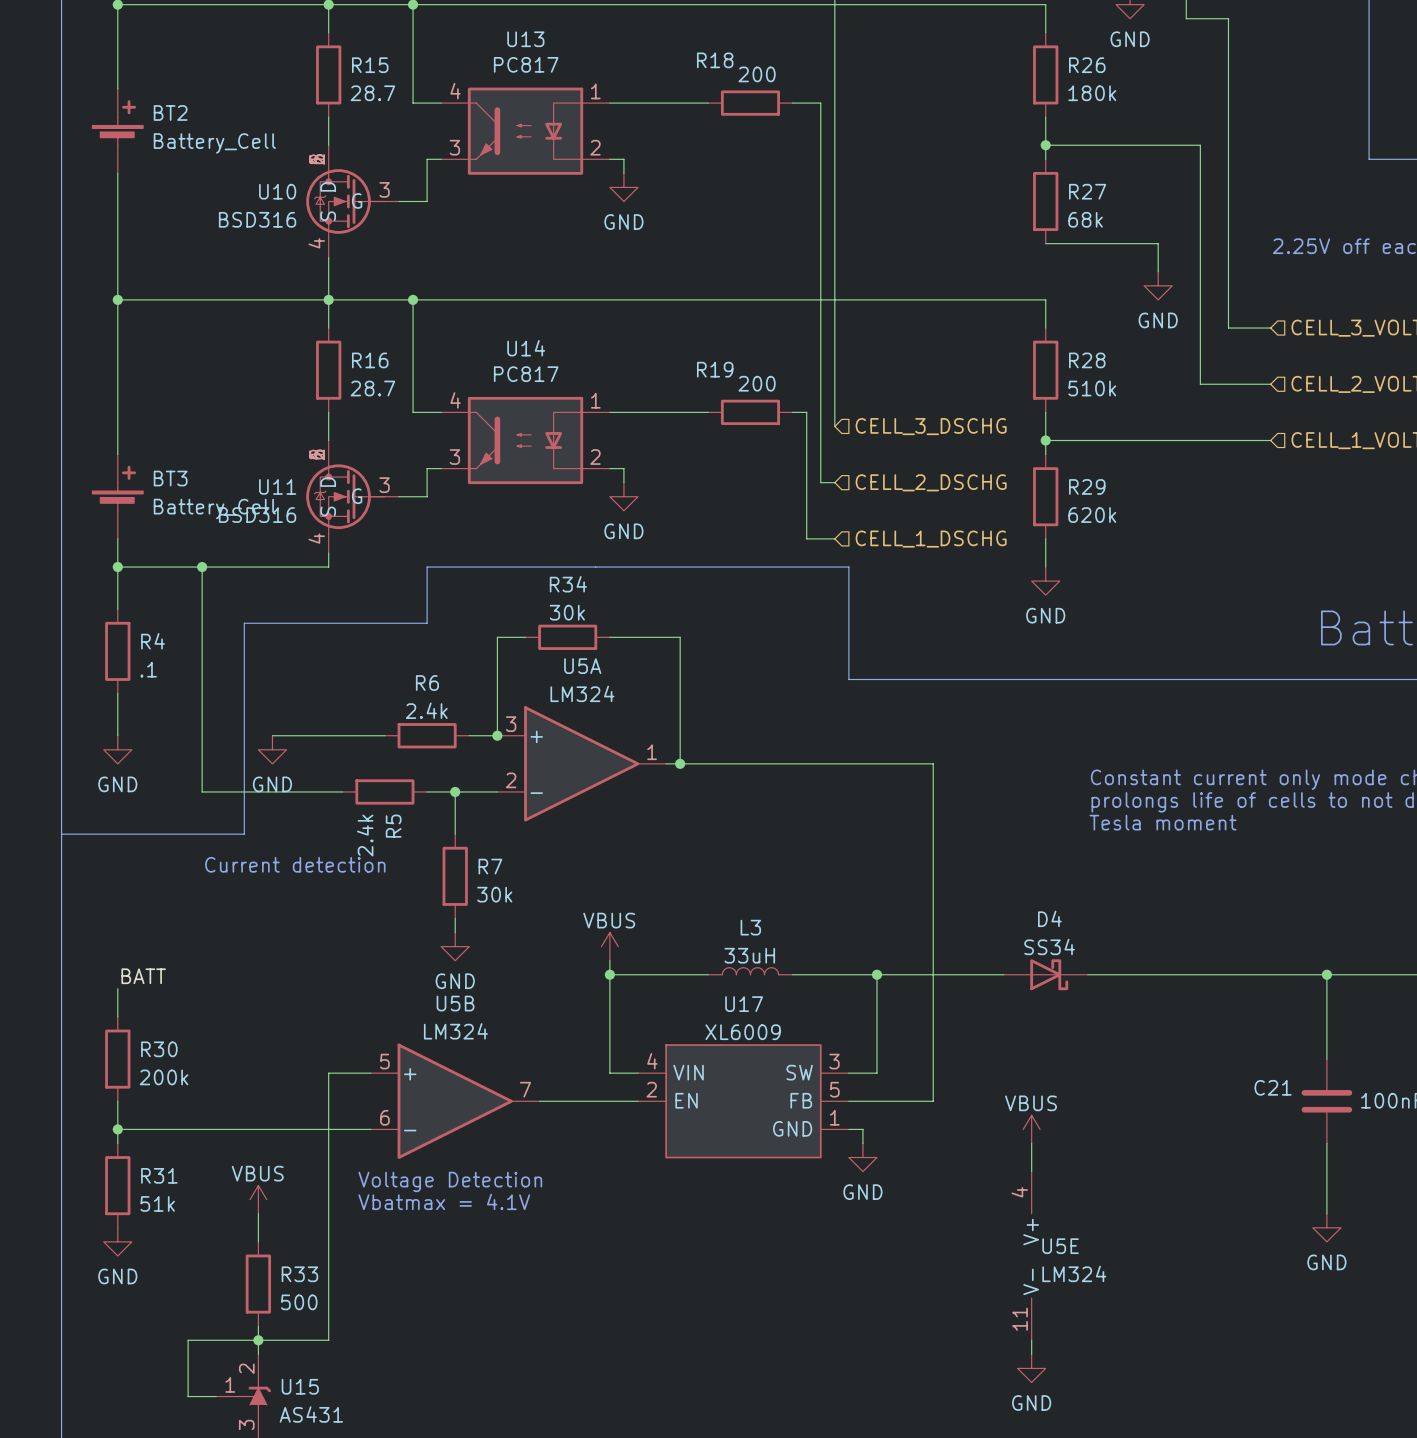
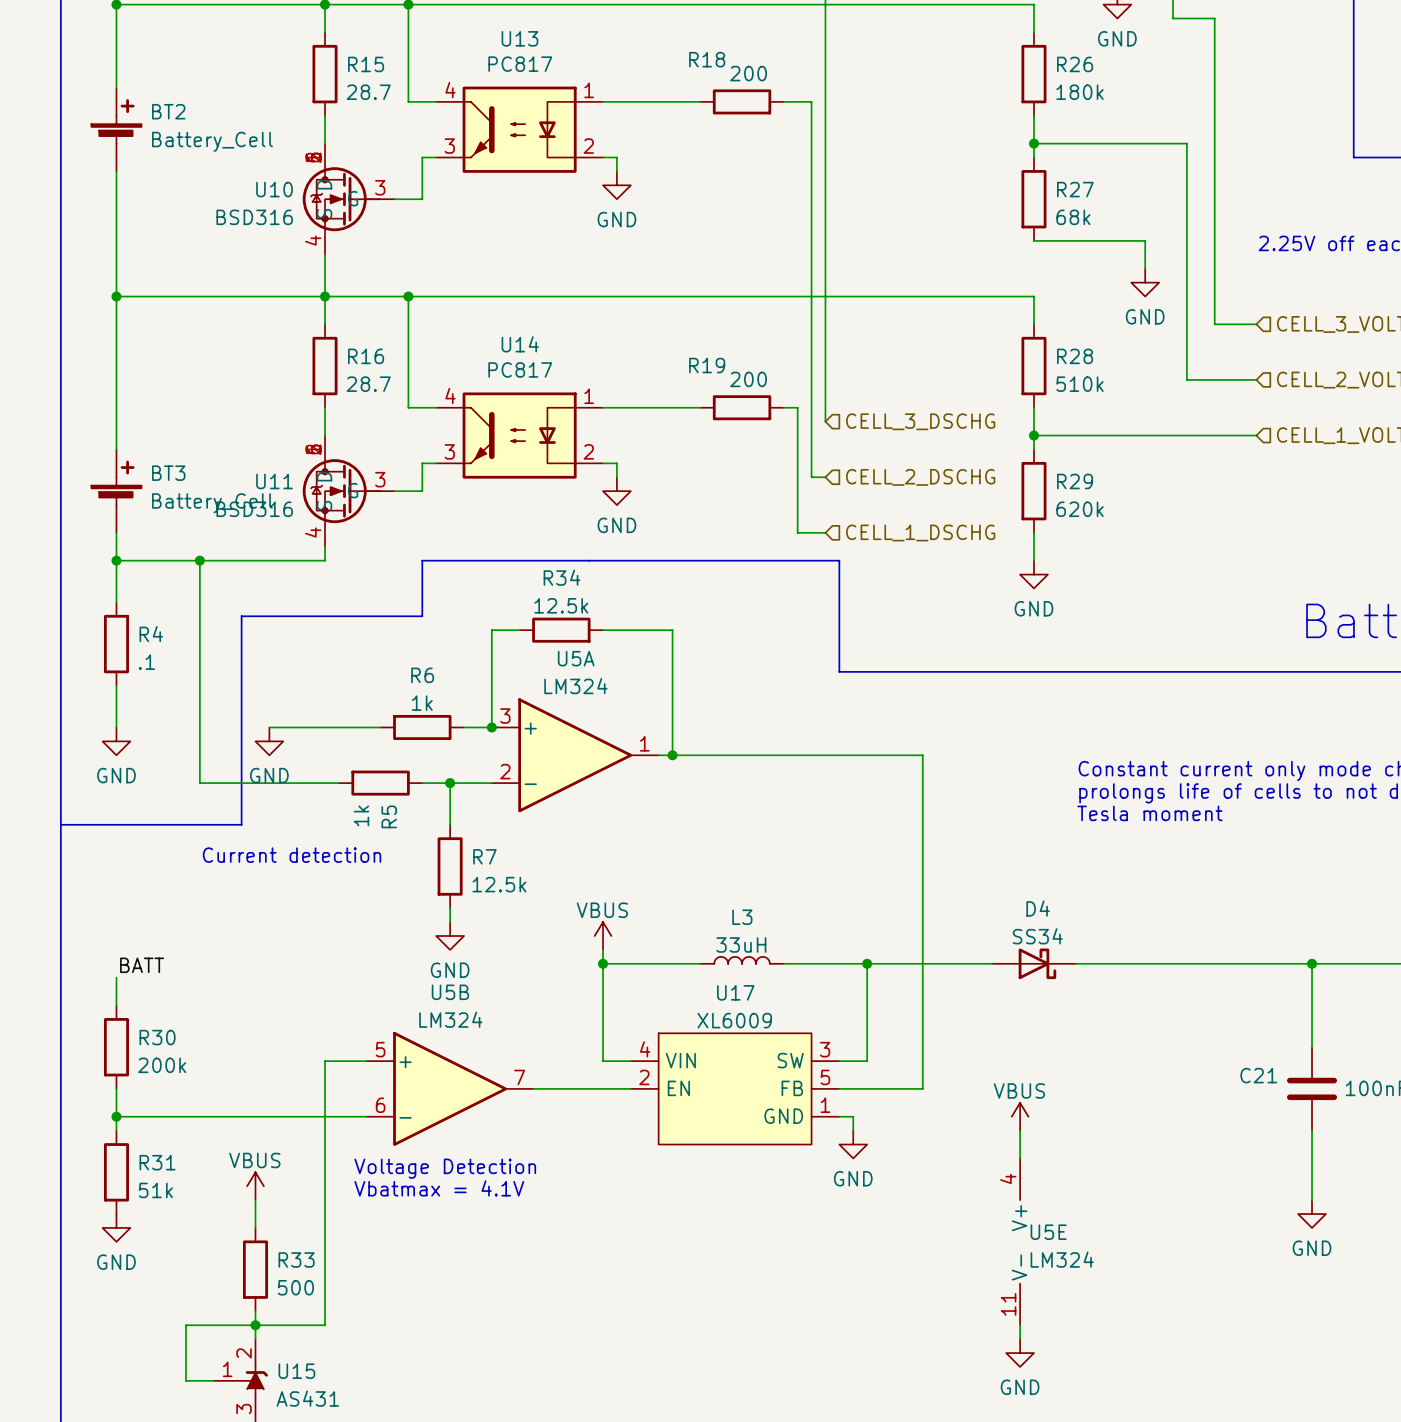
R34 value: 30k (567, 612) -> 12.5k (561, 605)
R6 value: 2.4k (426, 710) -> 1k (422, 703)
R5 value: 2.4k (365, 835) -> 1k (361, 815)
R7 value: 30k (494, 894) -> 12.5k (499, 884)

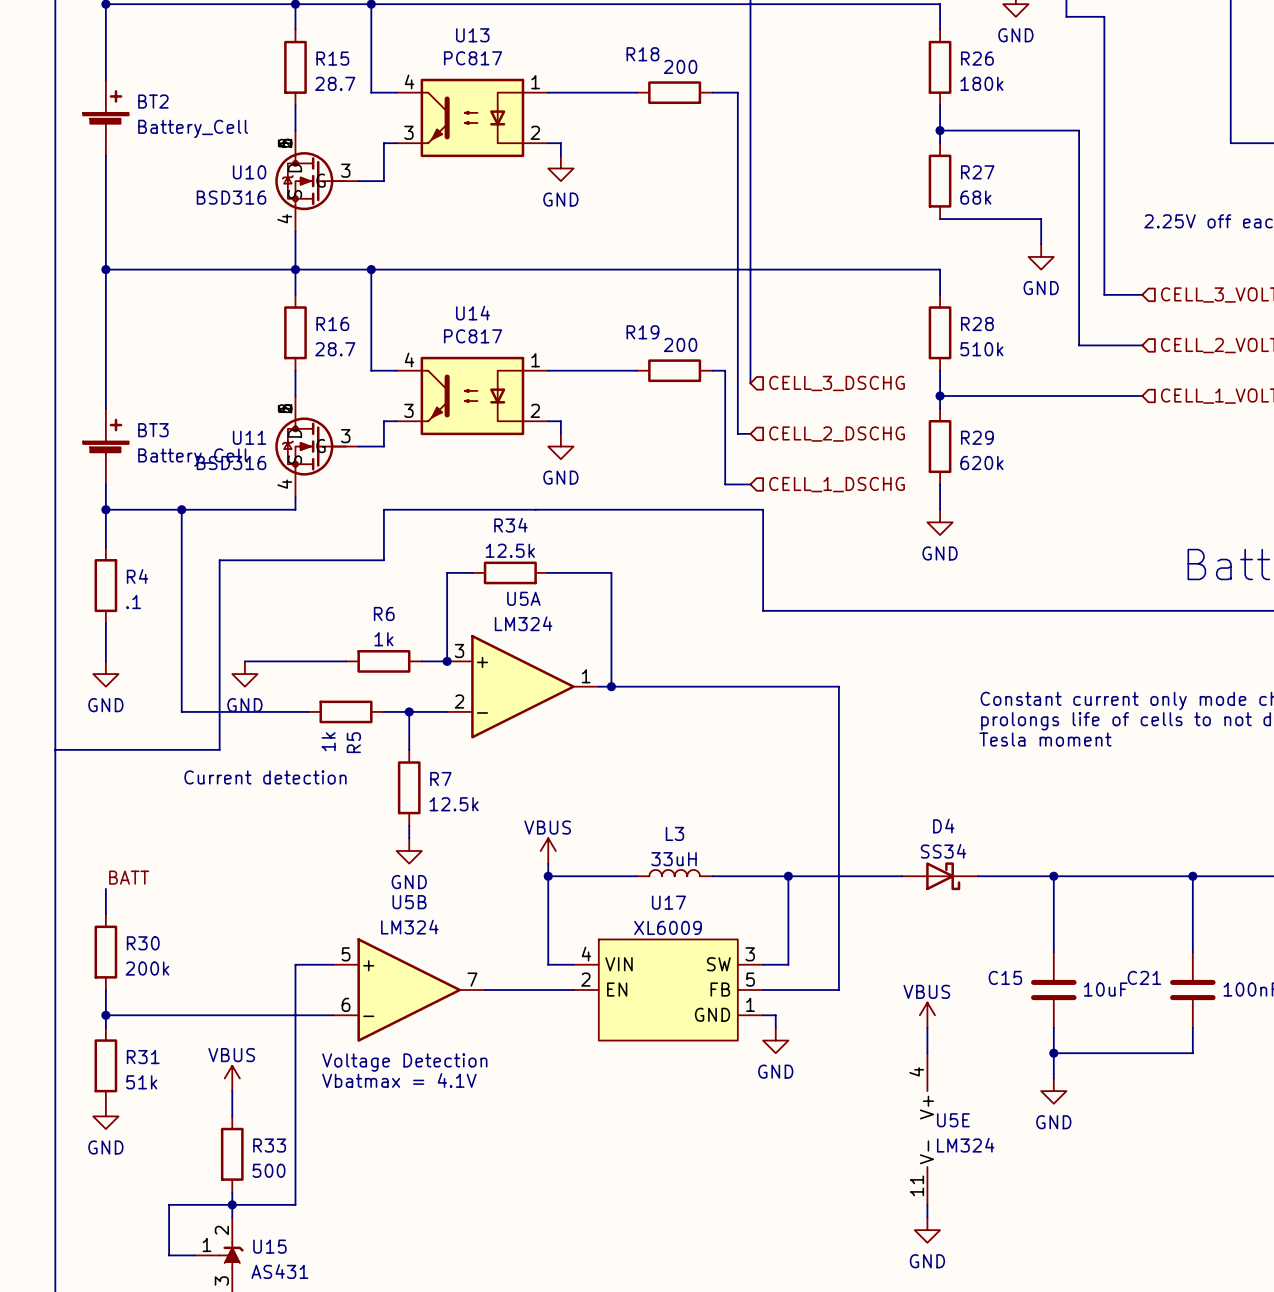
wire: none -> (1053, 876) (1053, 952)
junction: none -> (1053, 876)
C15: none -> 10uF (1053, 990)
wire: none -> (1053, 1027) (1053, 1078)
junction: none -> (1053, 1053)
wire: (1312, 1158) (1312, 1200) -> (1192, 1053) (1053, 1053)
power symbol position: GND (1312, 1214) -> GND (1053, 1091)

